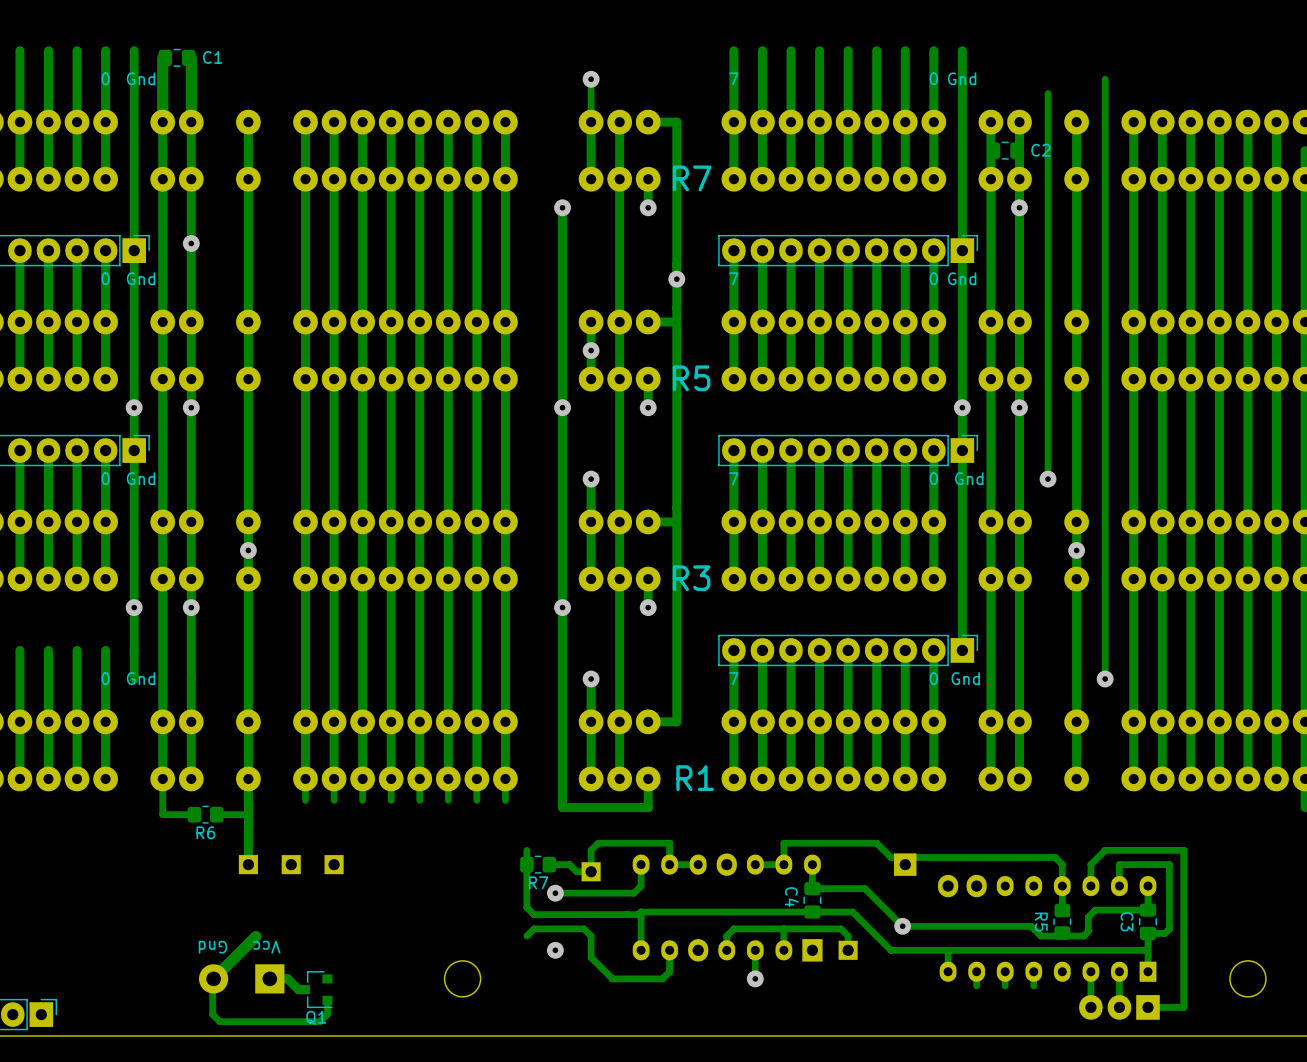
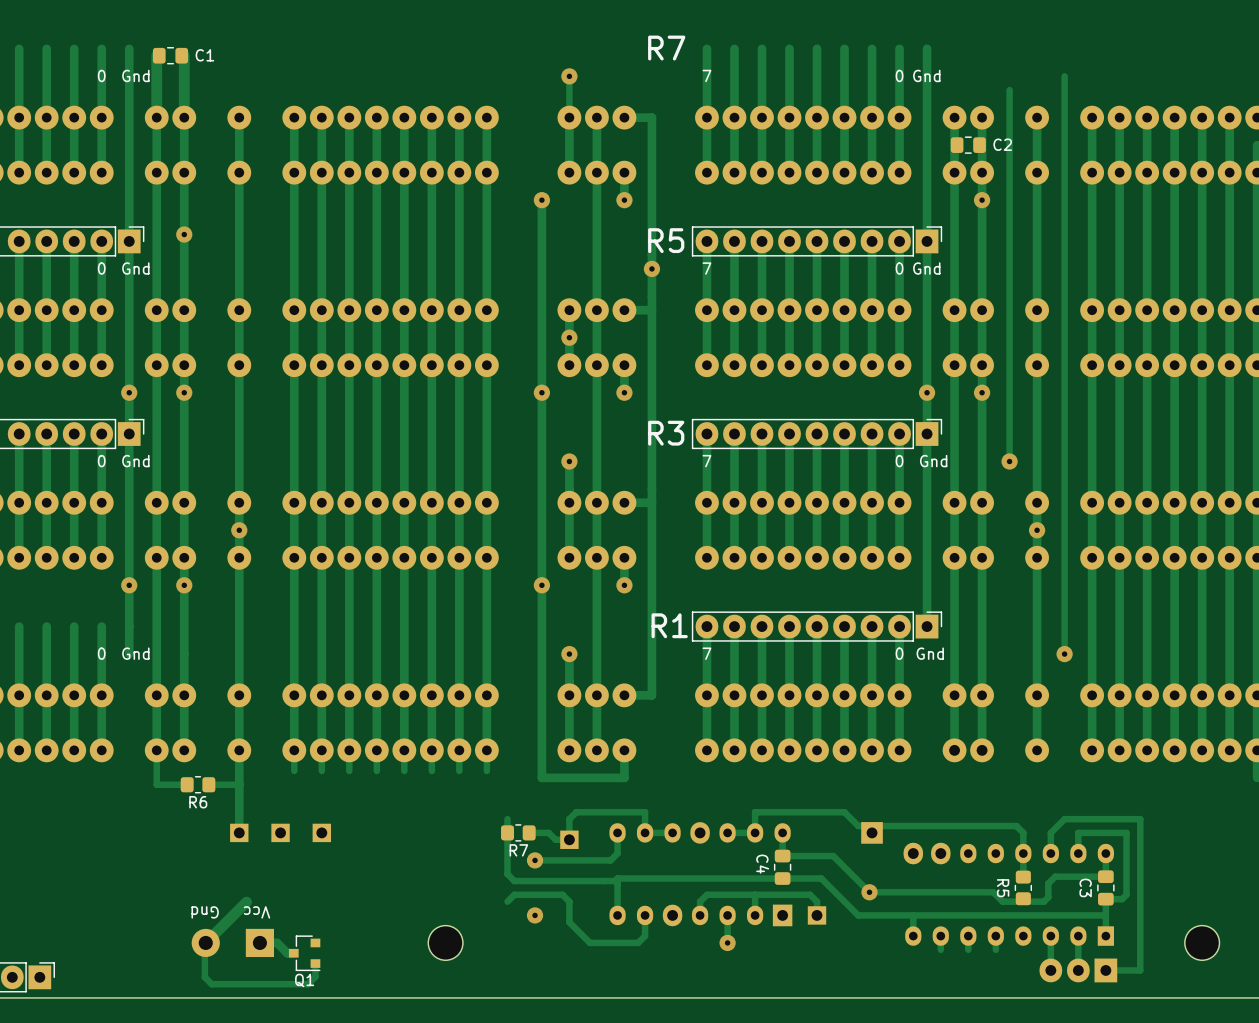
text position: R7 (692, 178) -> R7 (666, 48)
text position: R5 (691, 378) -> R5 (666, 240)
text position: R3 (691, 578) -> R3 (666, 433)
text position: R1 (695, 778) -> R1 (669, 625)

